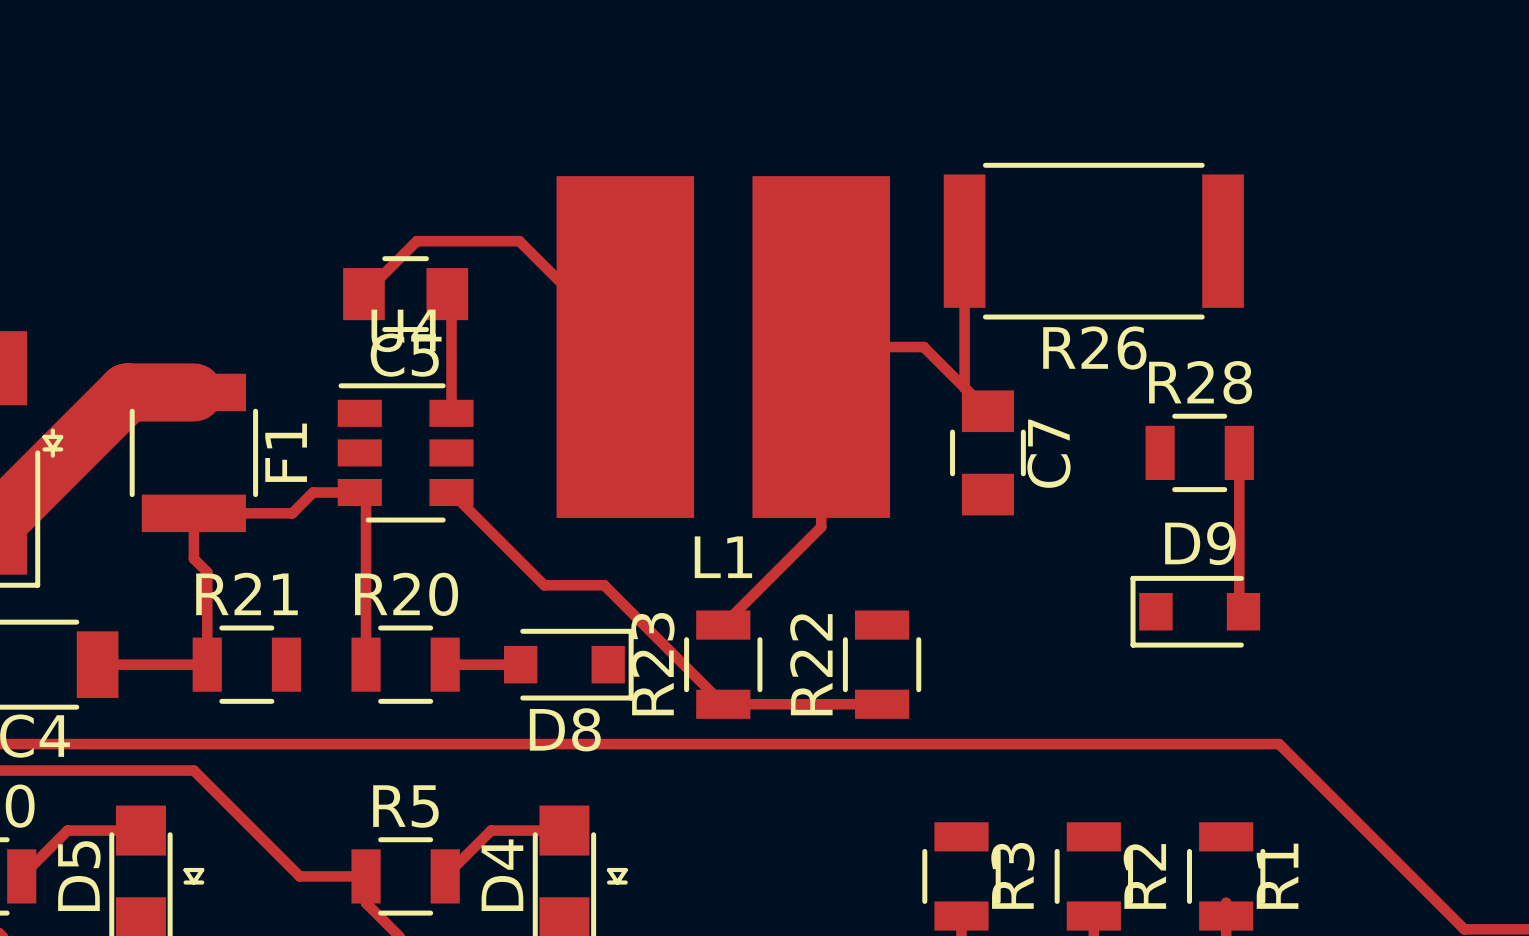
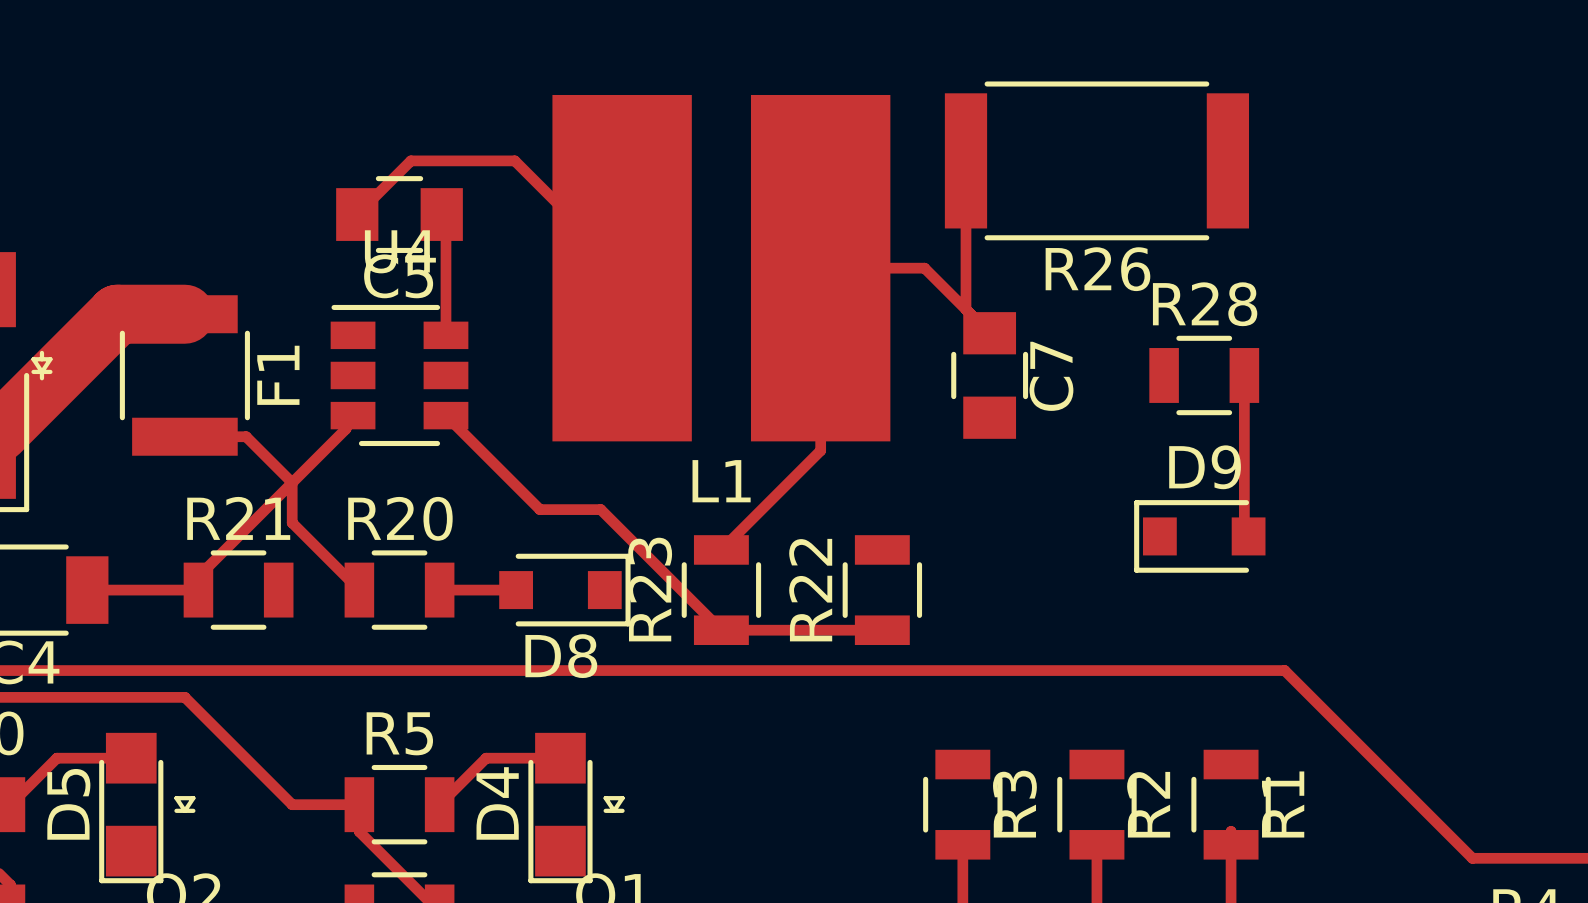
track: (193, 513) (193, 558) (207, 572) (207, 651) -> (353, 415) (345, 429) (198, 576)
track: (254, 513) (292, 513) (313, 492) (359, 492) (366, 498) (366, 664) -> (246, 436) (292, 482) (292, 522) (359, 590)

